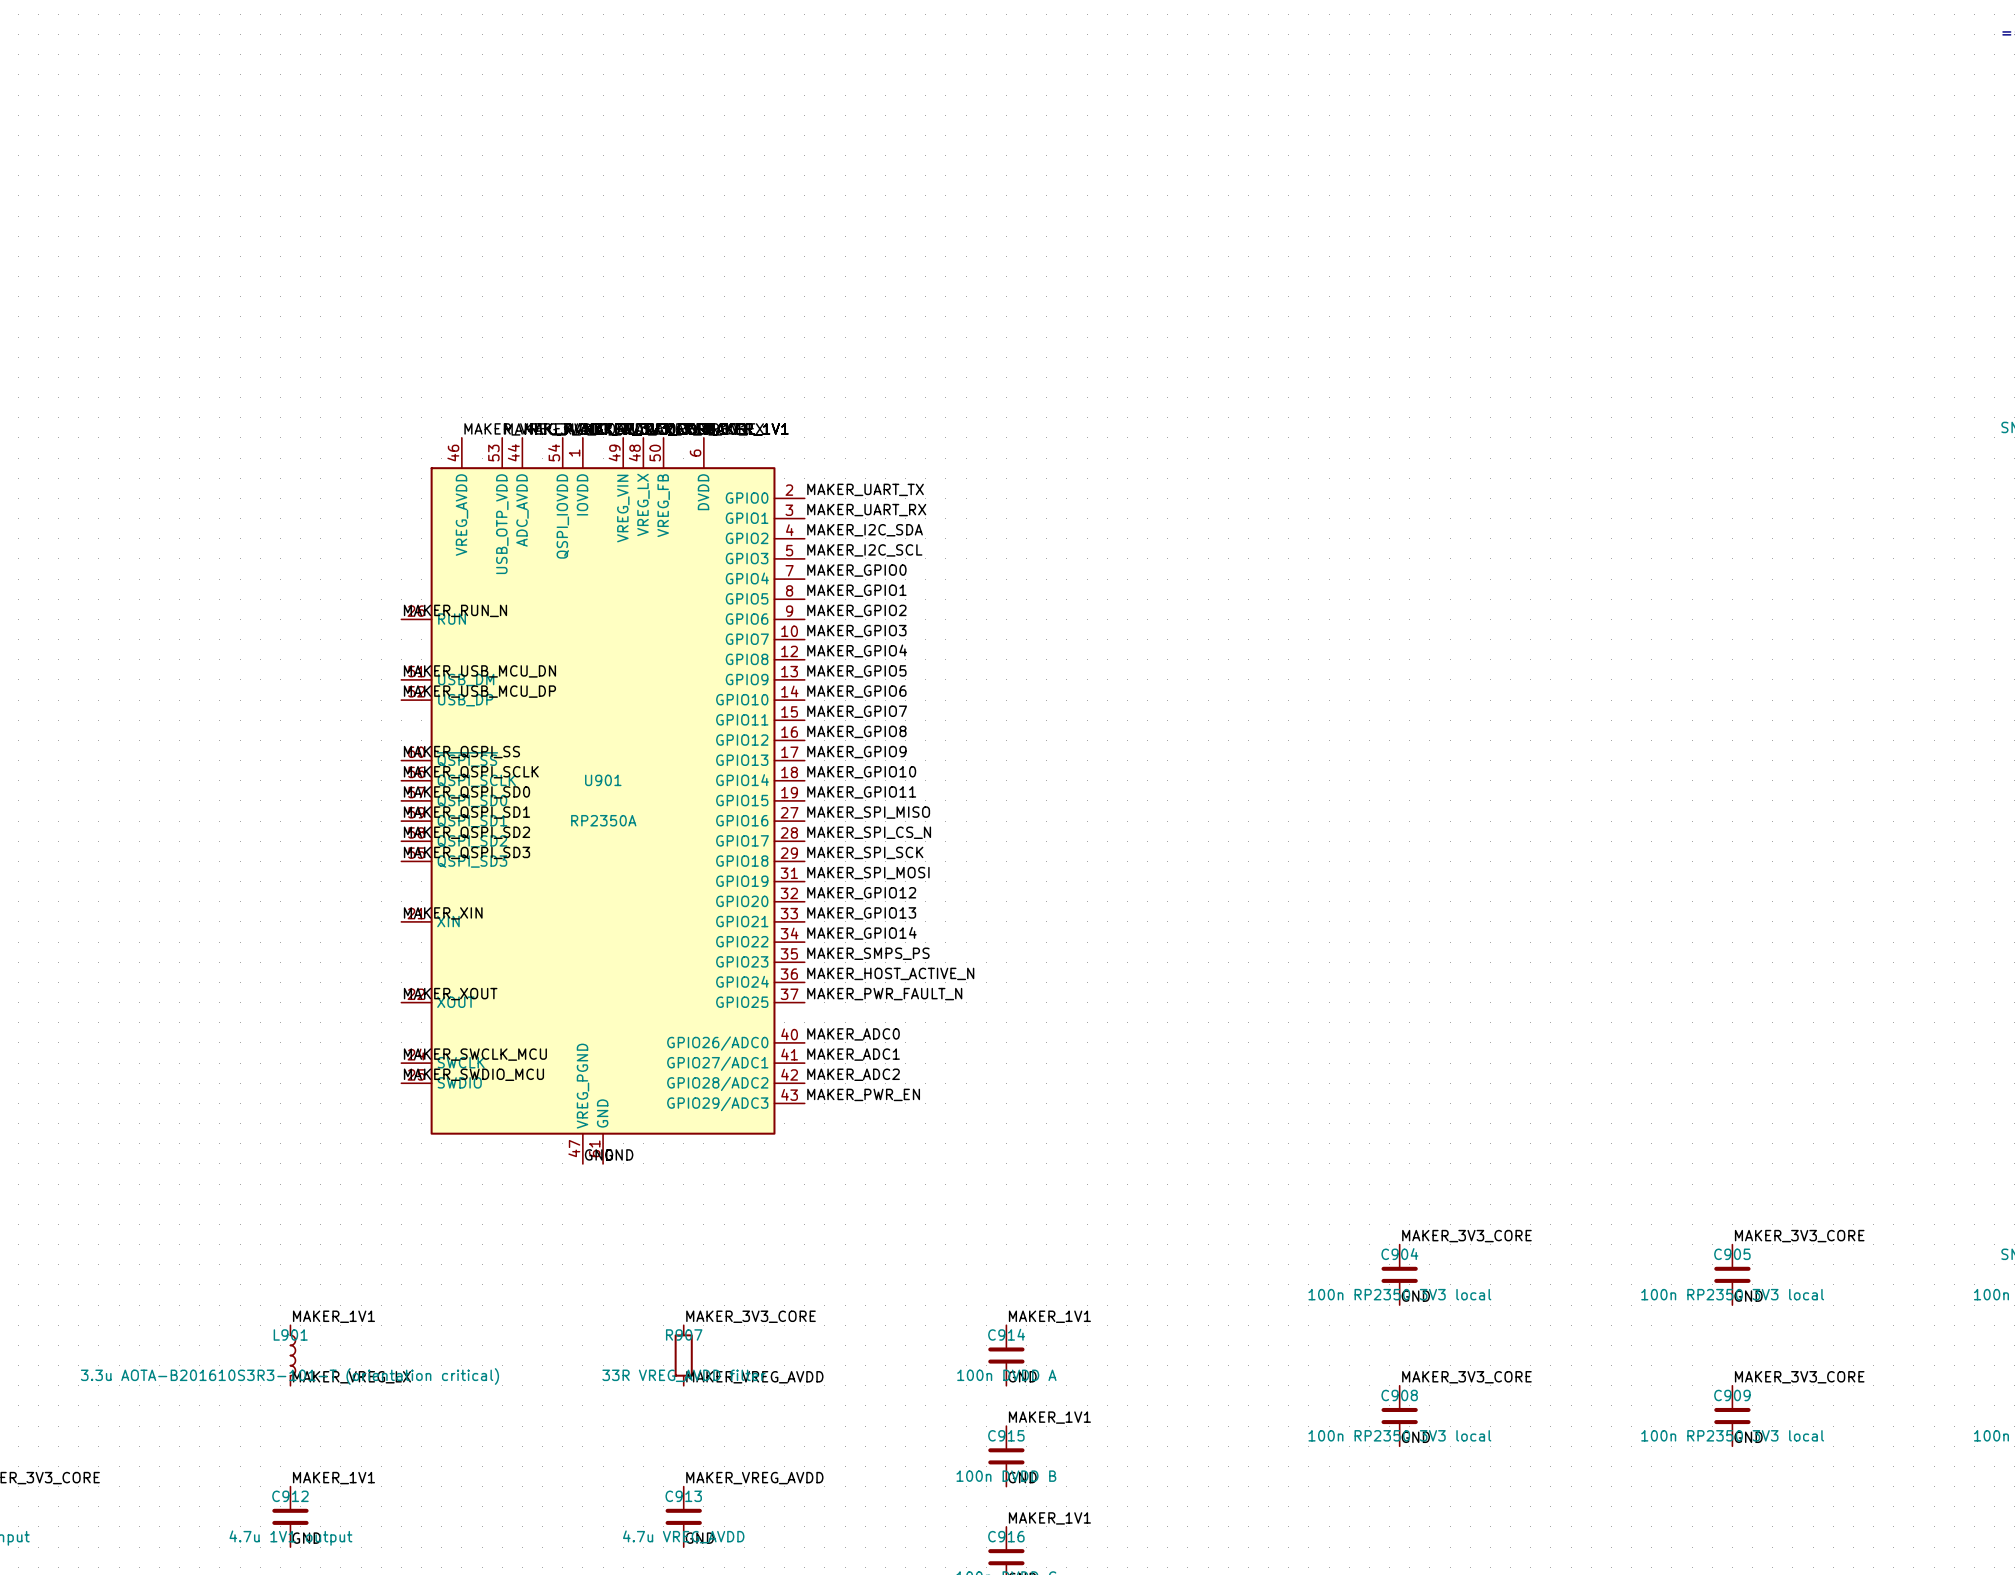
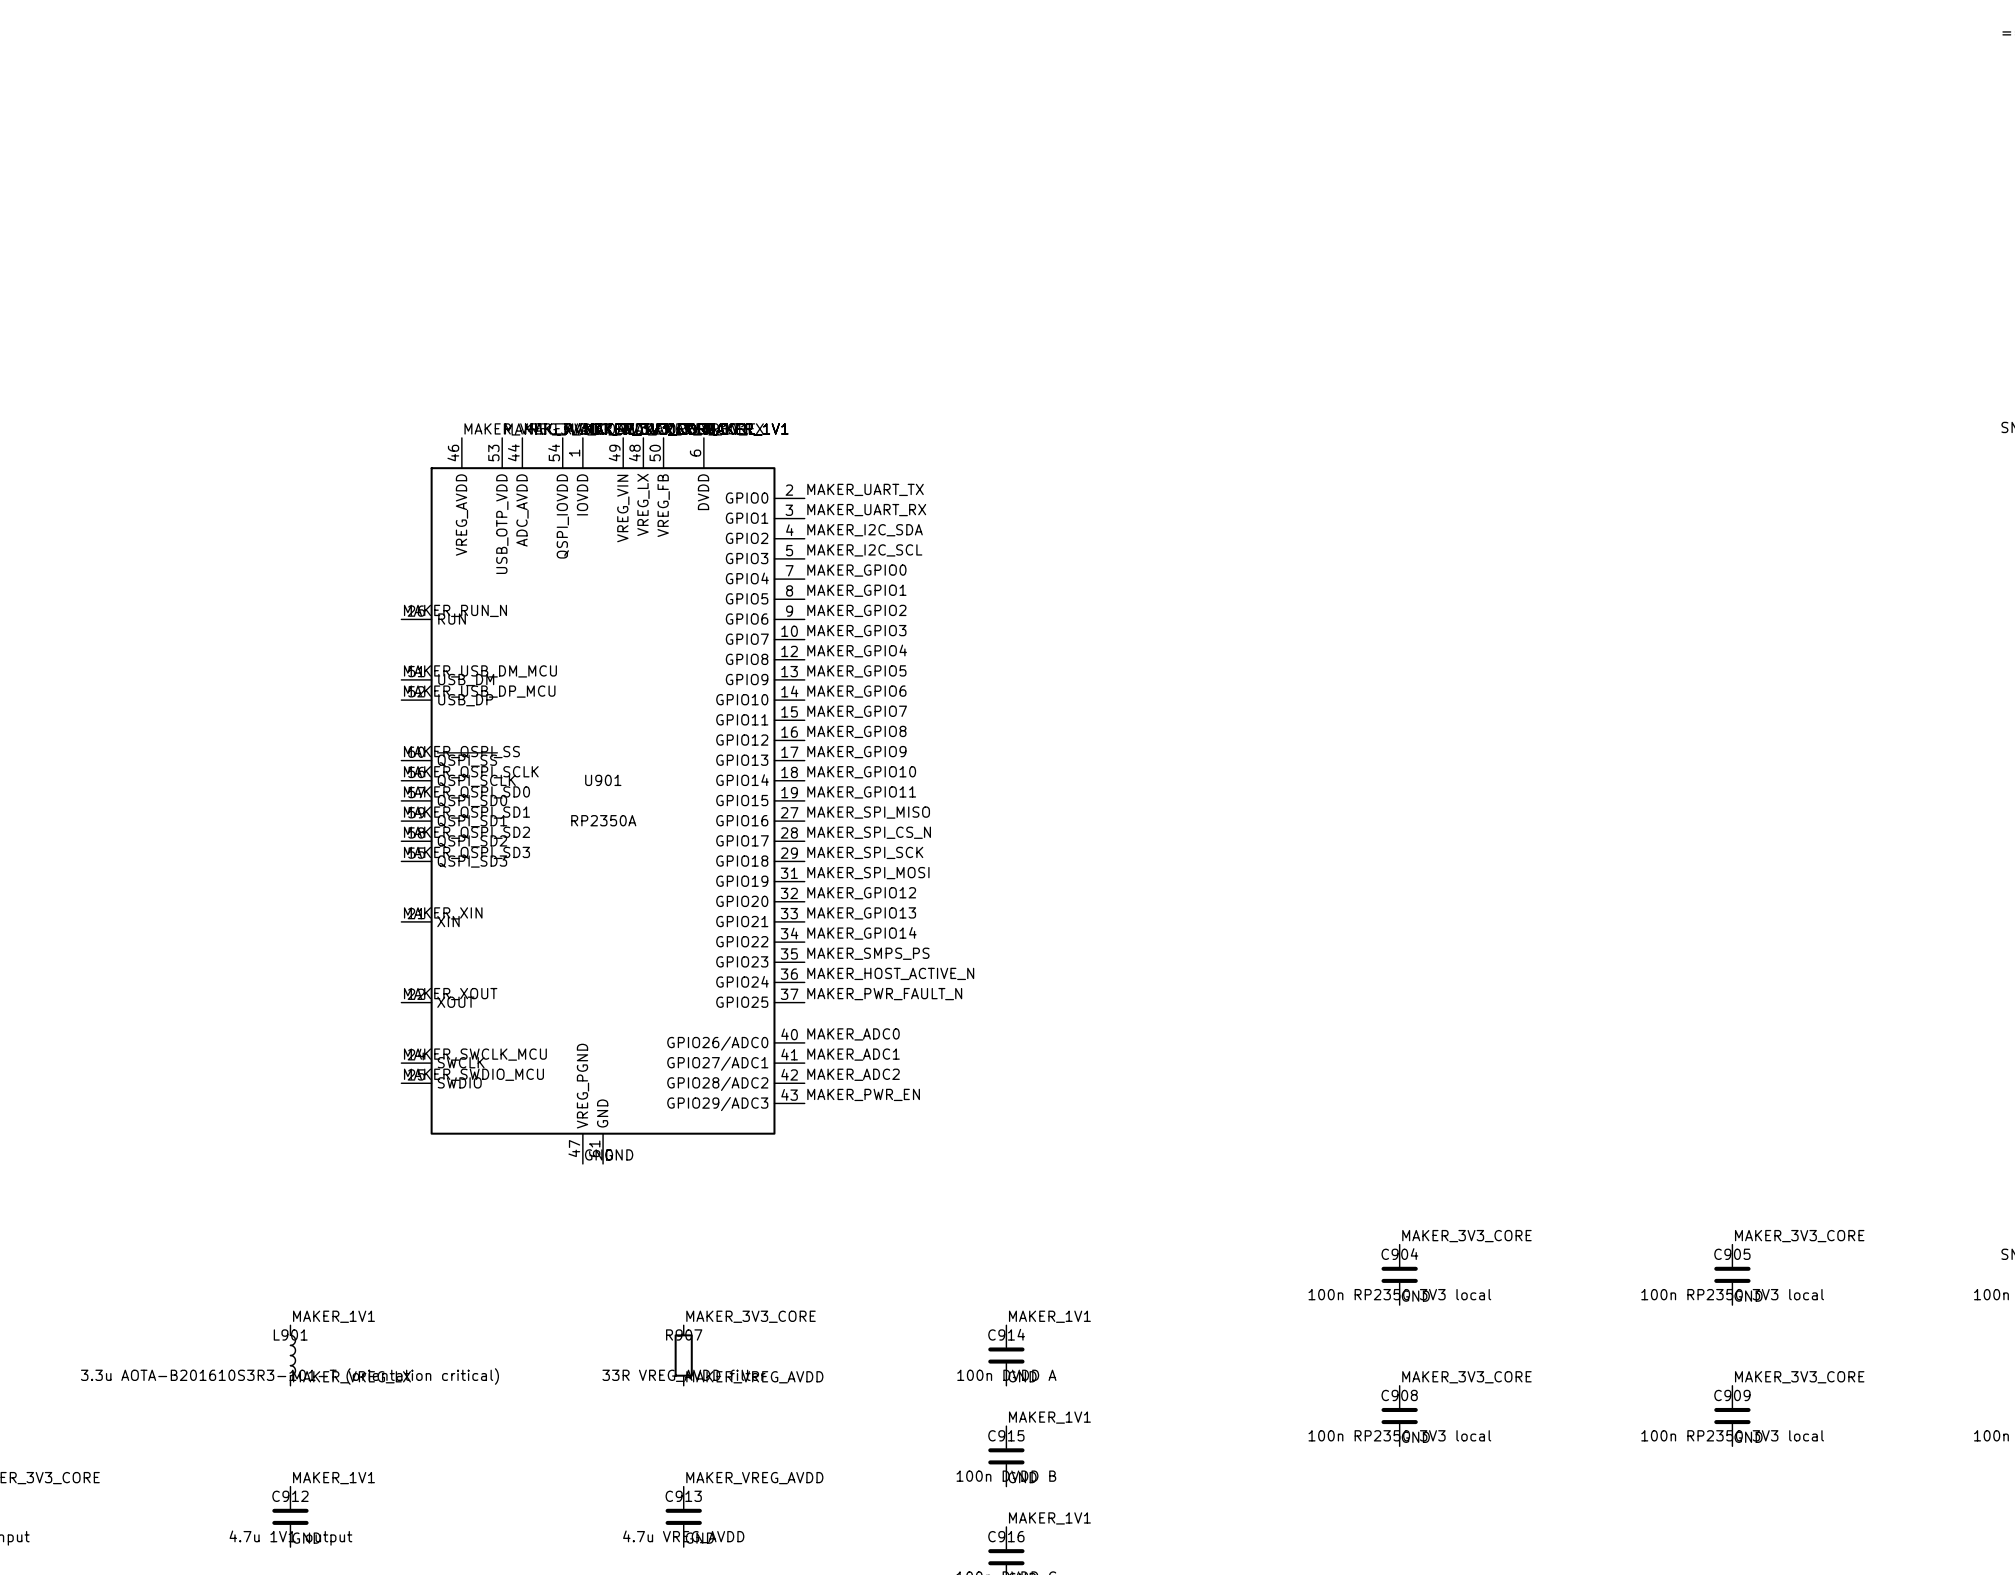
label: MAKER_USB_MCU_DN (479, 671) -> MAKER_USB_DM_MCU (480, 671)
label: MAKER_USB_MCU_DP (479, 691) -> MAKER_USB_DP_MCU (479, 691)

